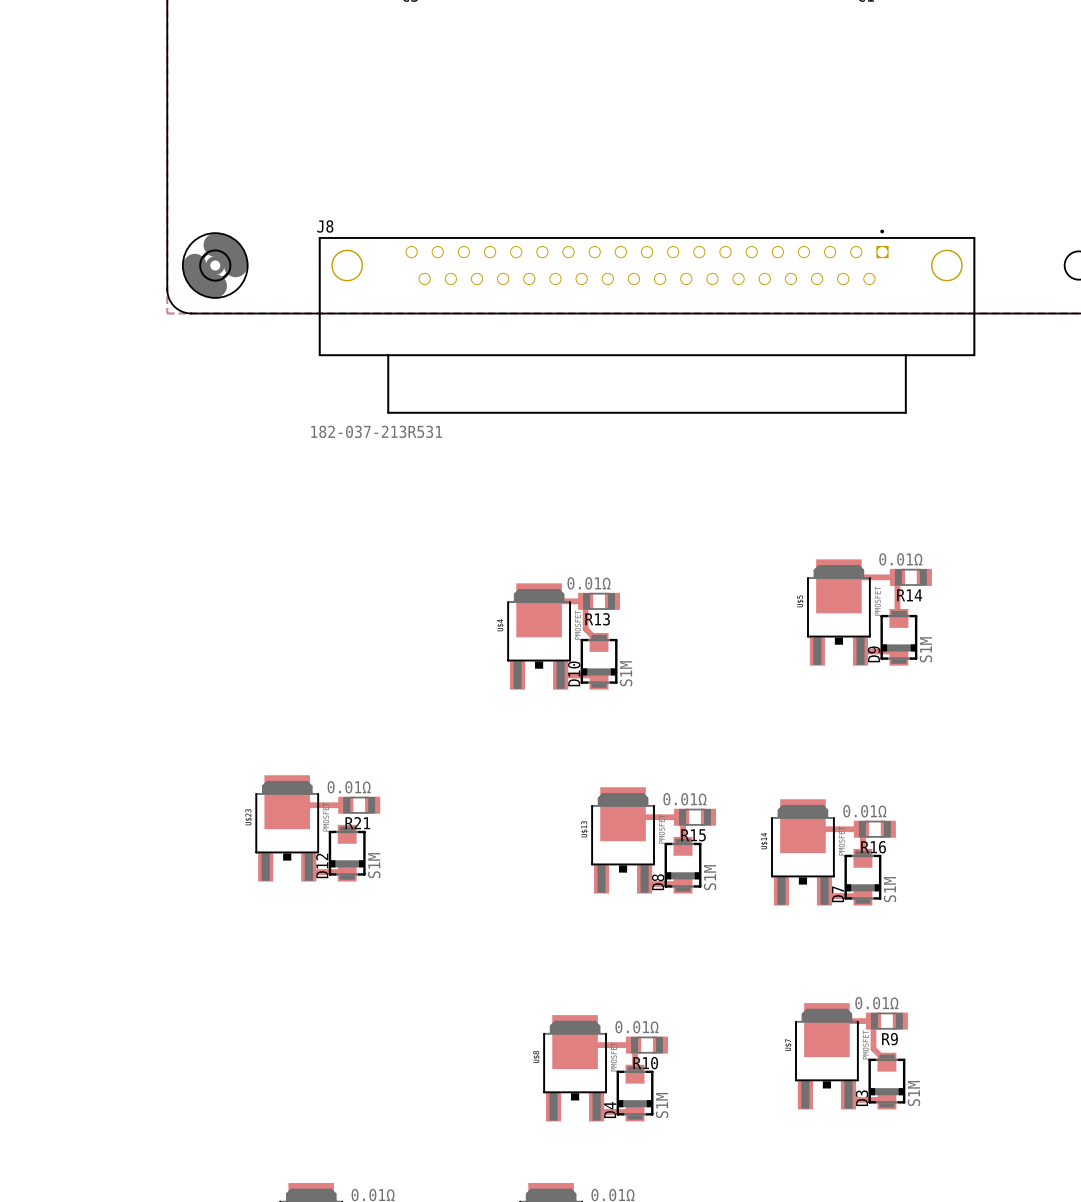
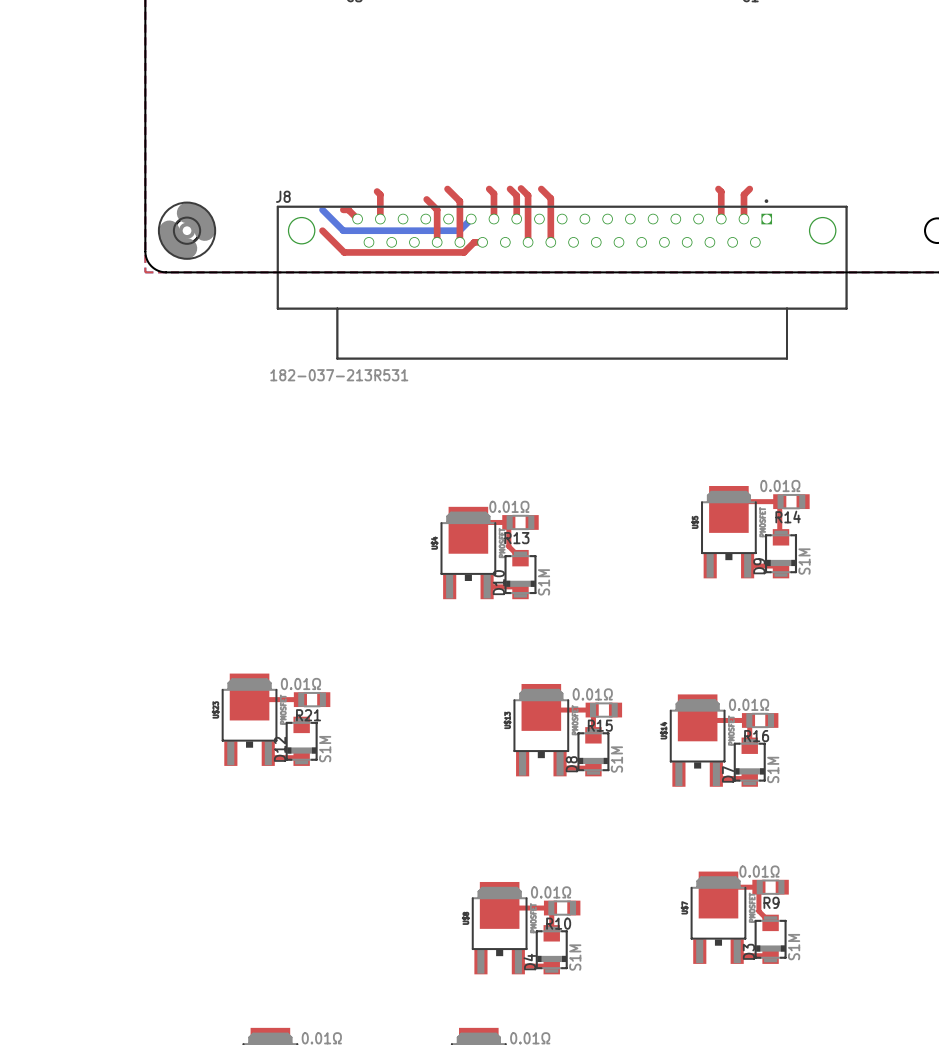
top track: none -> (521, 188) (528, 195) (528, 242)
top track: none -> (447, 189) (459, 201) (459, 242)
top track: none -> (489, 189) (493, 193) (493, 219)
top track: none -> (510, 189) (516, 195) (516, 219)
top track: none -> (541, 189) (550, 198) (550, 242)
top track: none -> (718, 189) (721, 191) (721, 219)
top track: none -> (749, 189) (744, 194) (744, 219)
top track: none -> (377, 191) (380, 194) (380, 219)
top track: none -> (426, 199) (437, 209) (437, 242)
bottom track: none -> (322, 209) (343, 230) (459, 230) (471, 219)
top track: none -> (343, 209) (348, 209) (357, 219)
top track: none -> (322, 230) (344, 252) (464, 252) (474, 242) (482, 242)

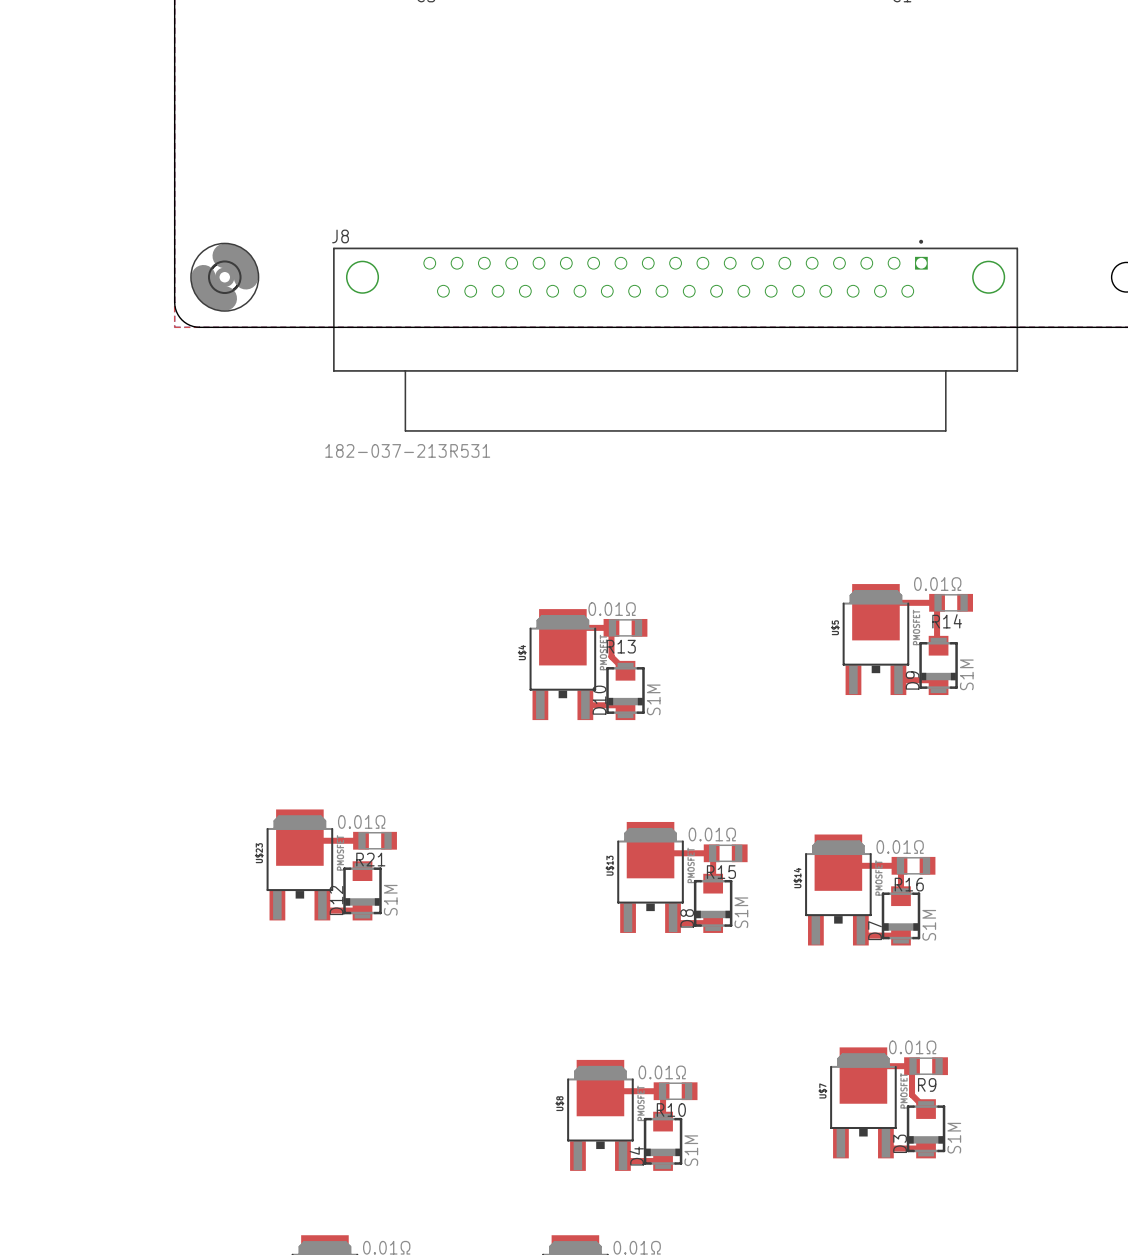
top track: (521, 188) (528, 195) (528, 242) -> none
top track: (447, 189) (459, 201) (459, 242) -> none
top track: (489, 189) (493, 193) (493, 219) -> none
top track: (510, 189) (516, 195) (516, 219) -> none
top track: (541, 189) (550, 198) (550, 242) -> none
top track: (718, 189) (721, 191) (721, 219) -> none
top track: (749, 189) (744, 194) (744, 219) -> none
top track: (377, 191) (380, 194) (380, 219) -> none
top track: (426, 199) (437, 209) (437, 242) -> none
bottom track: (322, 209) (343, 230) (459, 230) (471, 219) -> none
top track: (343, 209) (348, 209) (357, 219) -> none
top track: (322, 230) (344, 252) (464, 252) (474, 242) (482, 242) -> none

